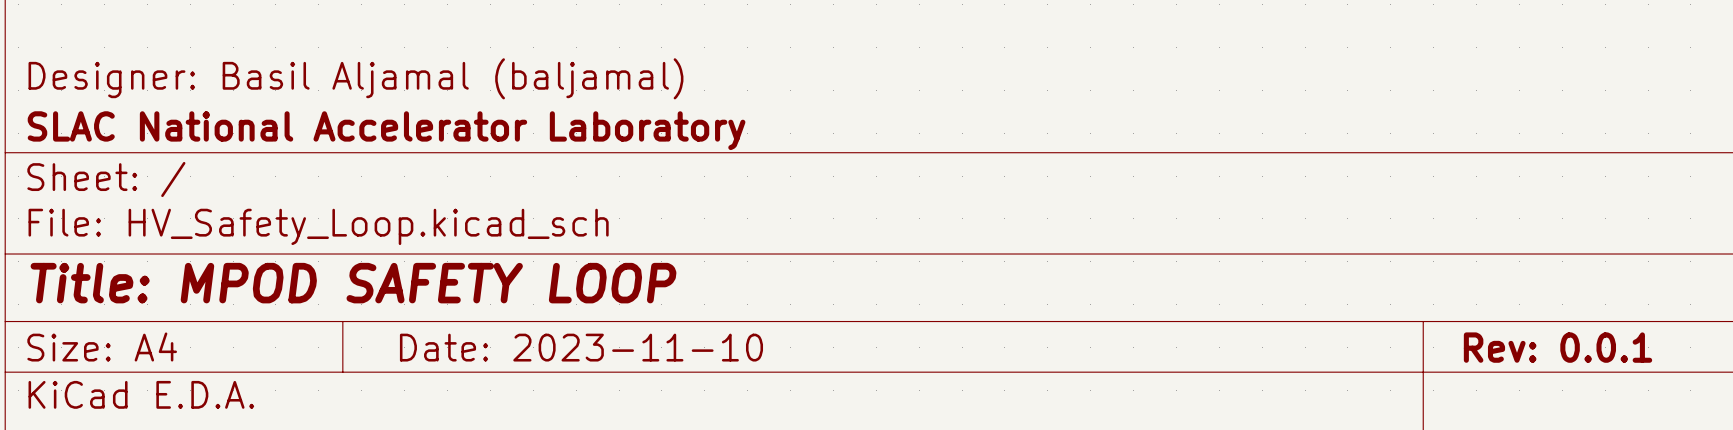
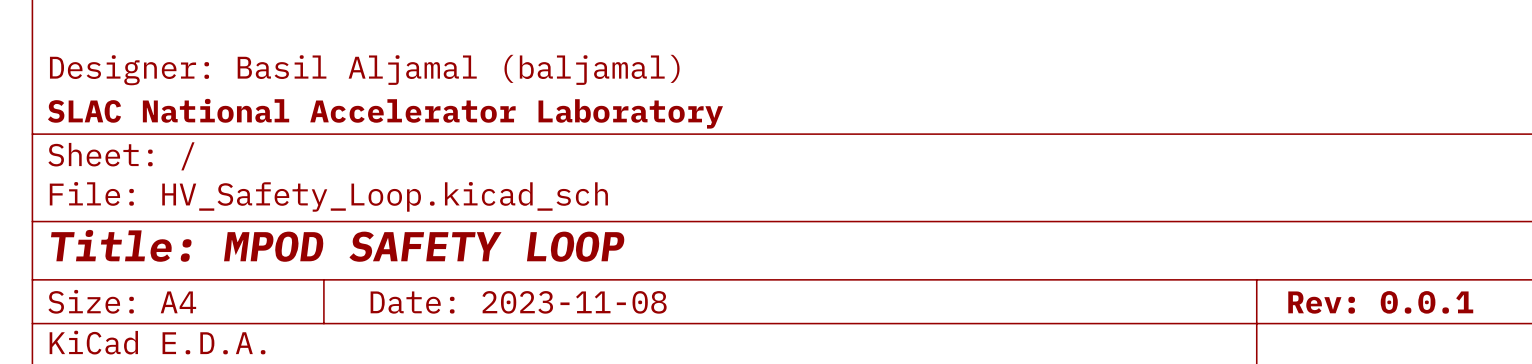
title block: Date: 2023-11-10 (581, 347) -> Date: 2023-11-08 (518, 302)

